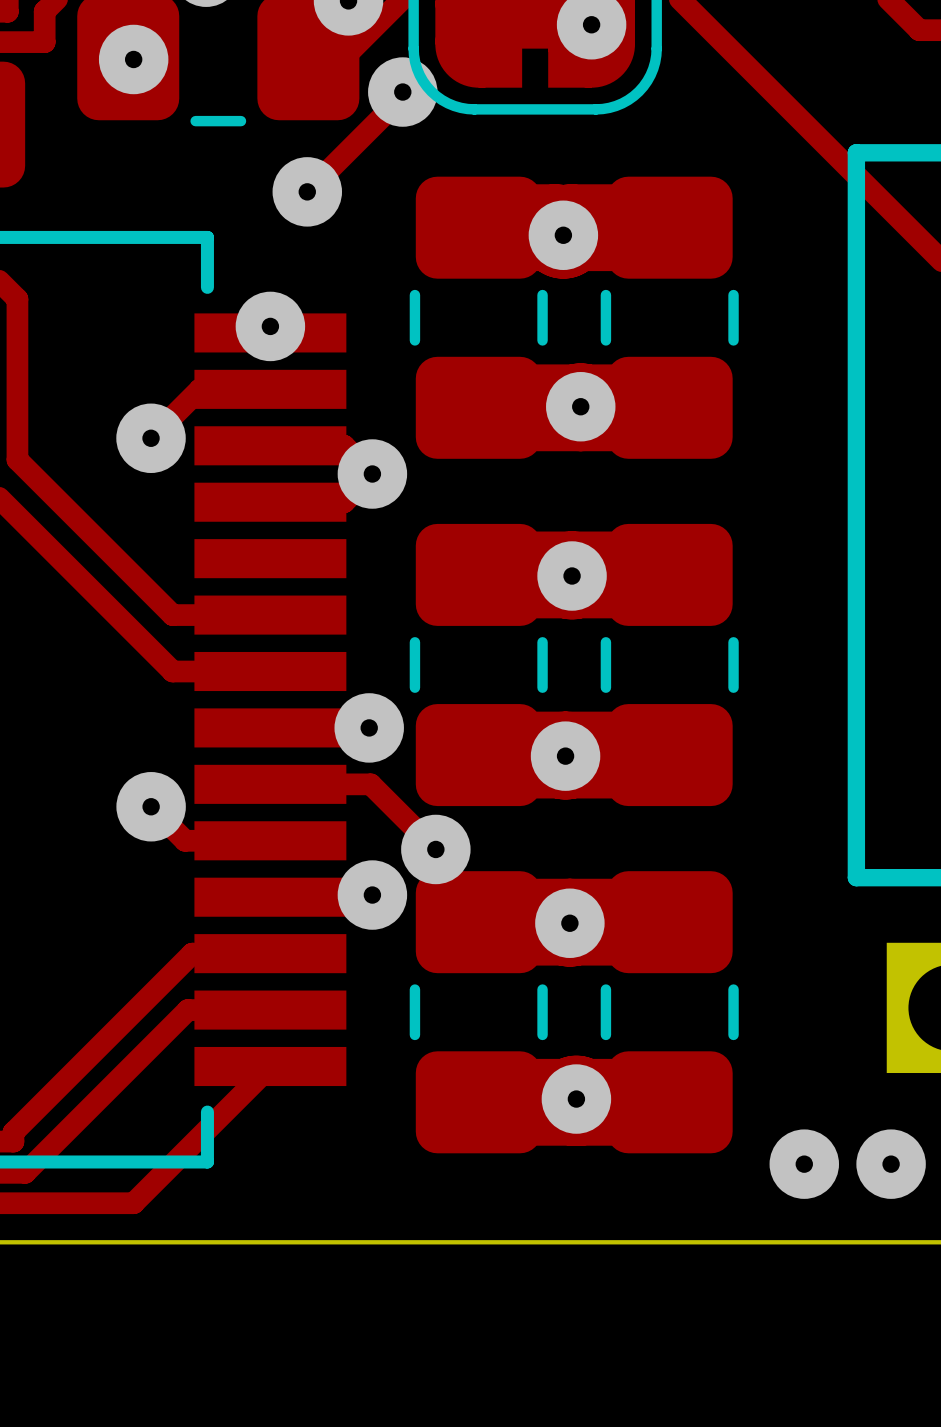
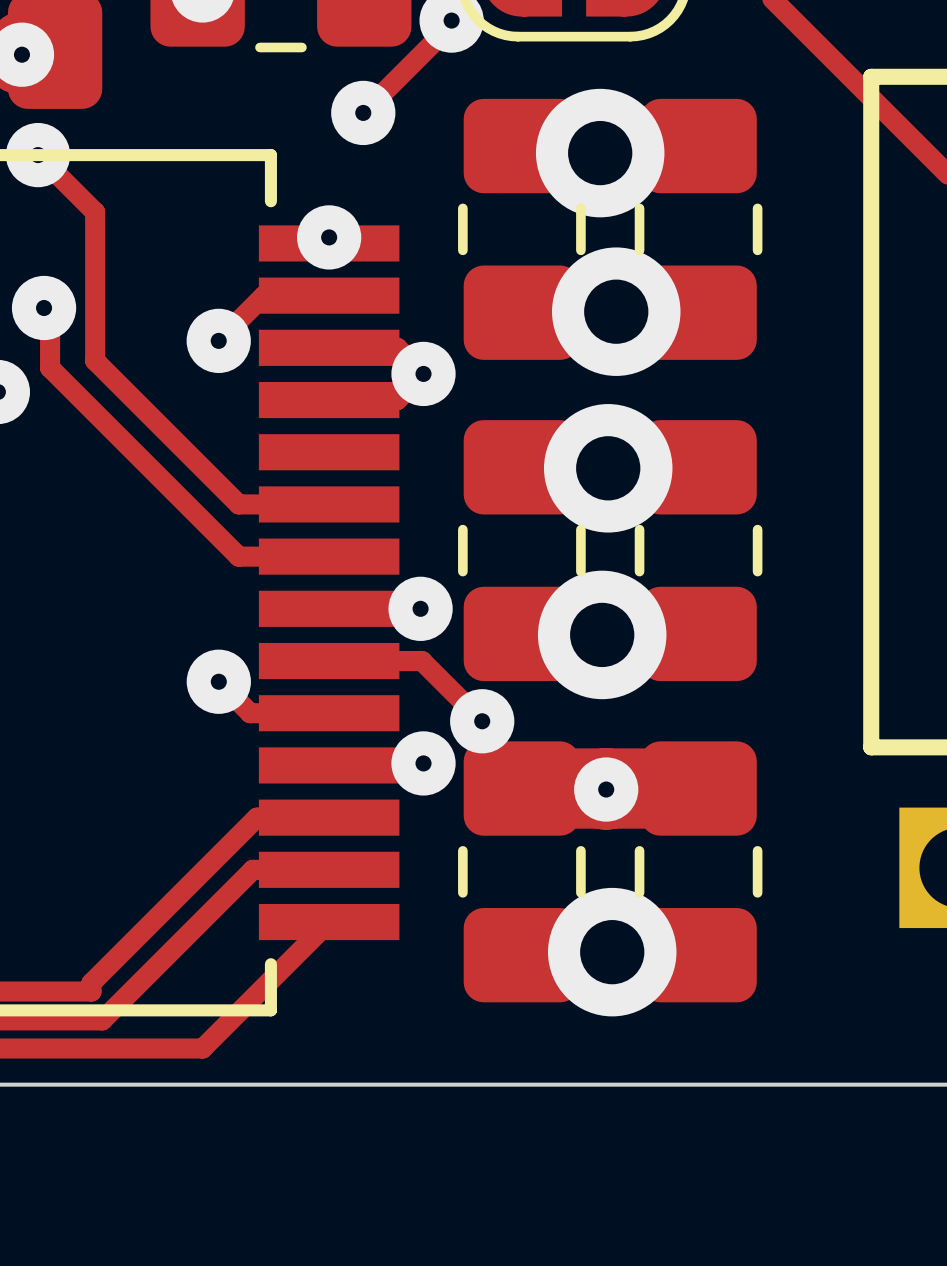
via size: [528, 200, 599, 271] -> [535, 88, 665, 218]
via size: [546, 372, 616, 442] -> [552, 247, 681, 376]
via size: [537, 541, 607, 611] -> [543, 404, 673, 533]
via size: [530, 721, 601, 791] -> [537, 570, 667, 700]
via size: [541, 1064, 612, 1134] -> [547, 887, 677, 1017]
via: (804, 1164) -> none
via: (891, 1164) -> none

